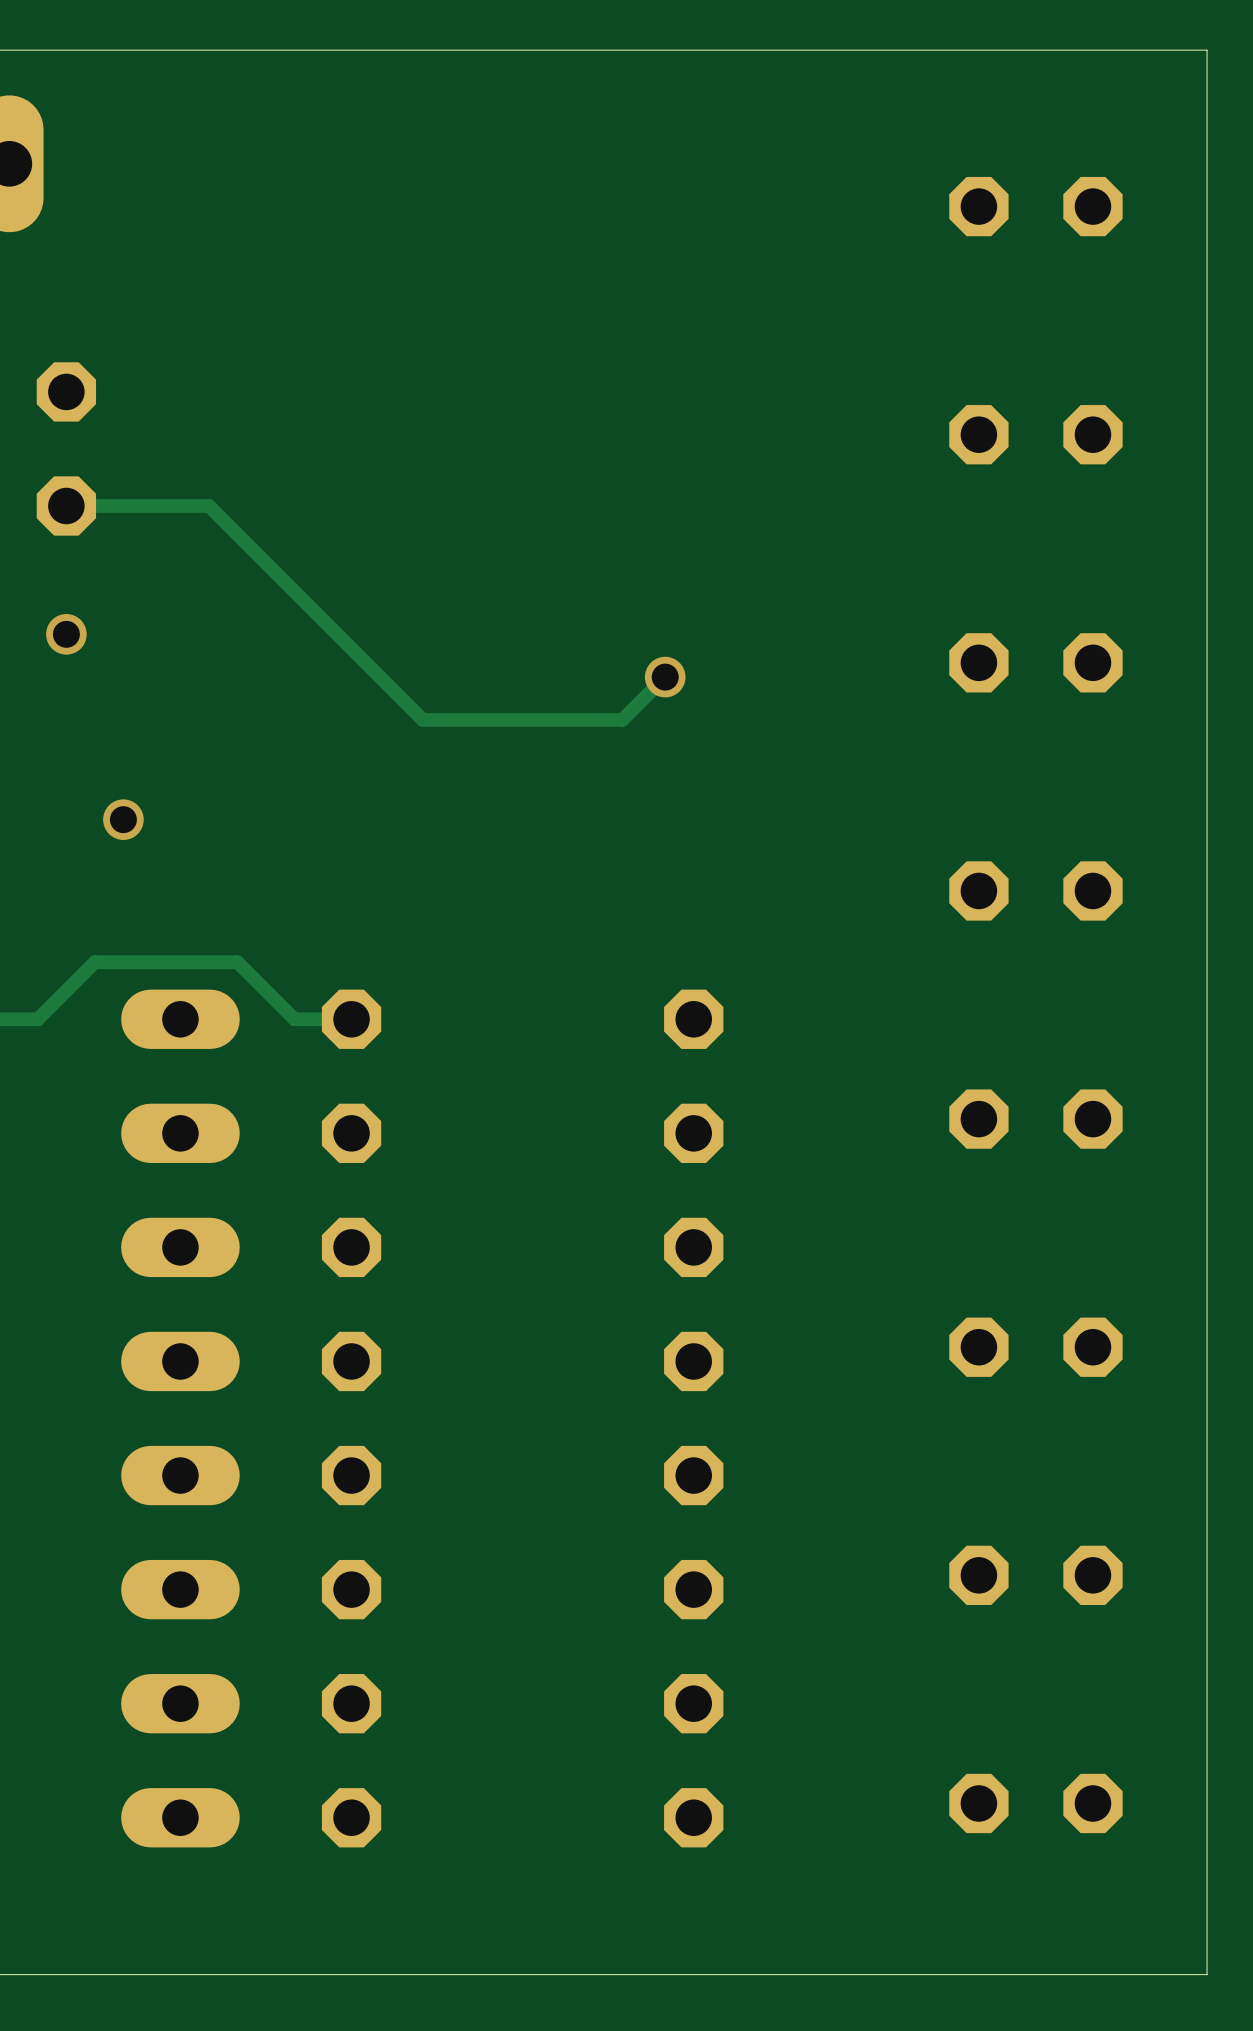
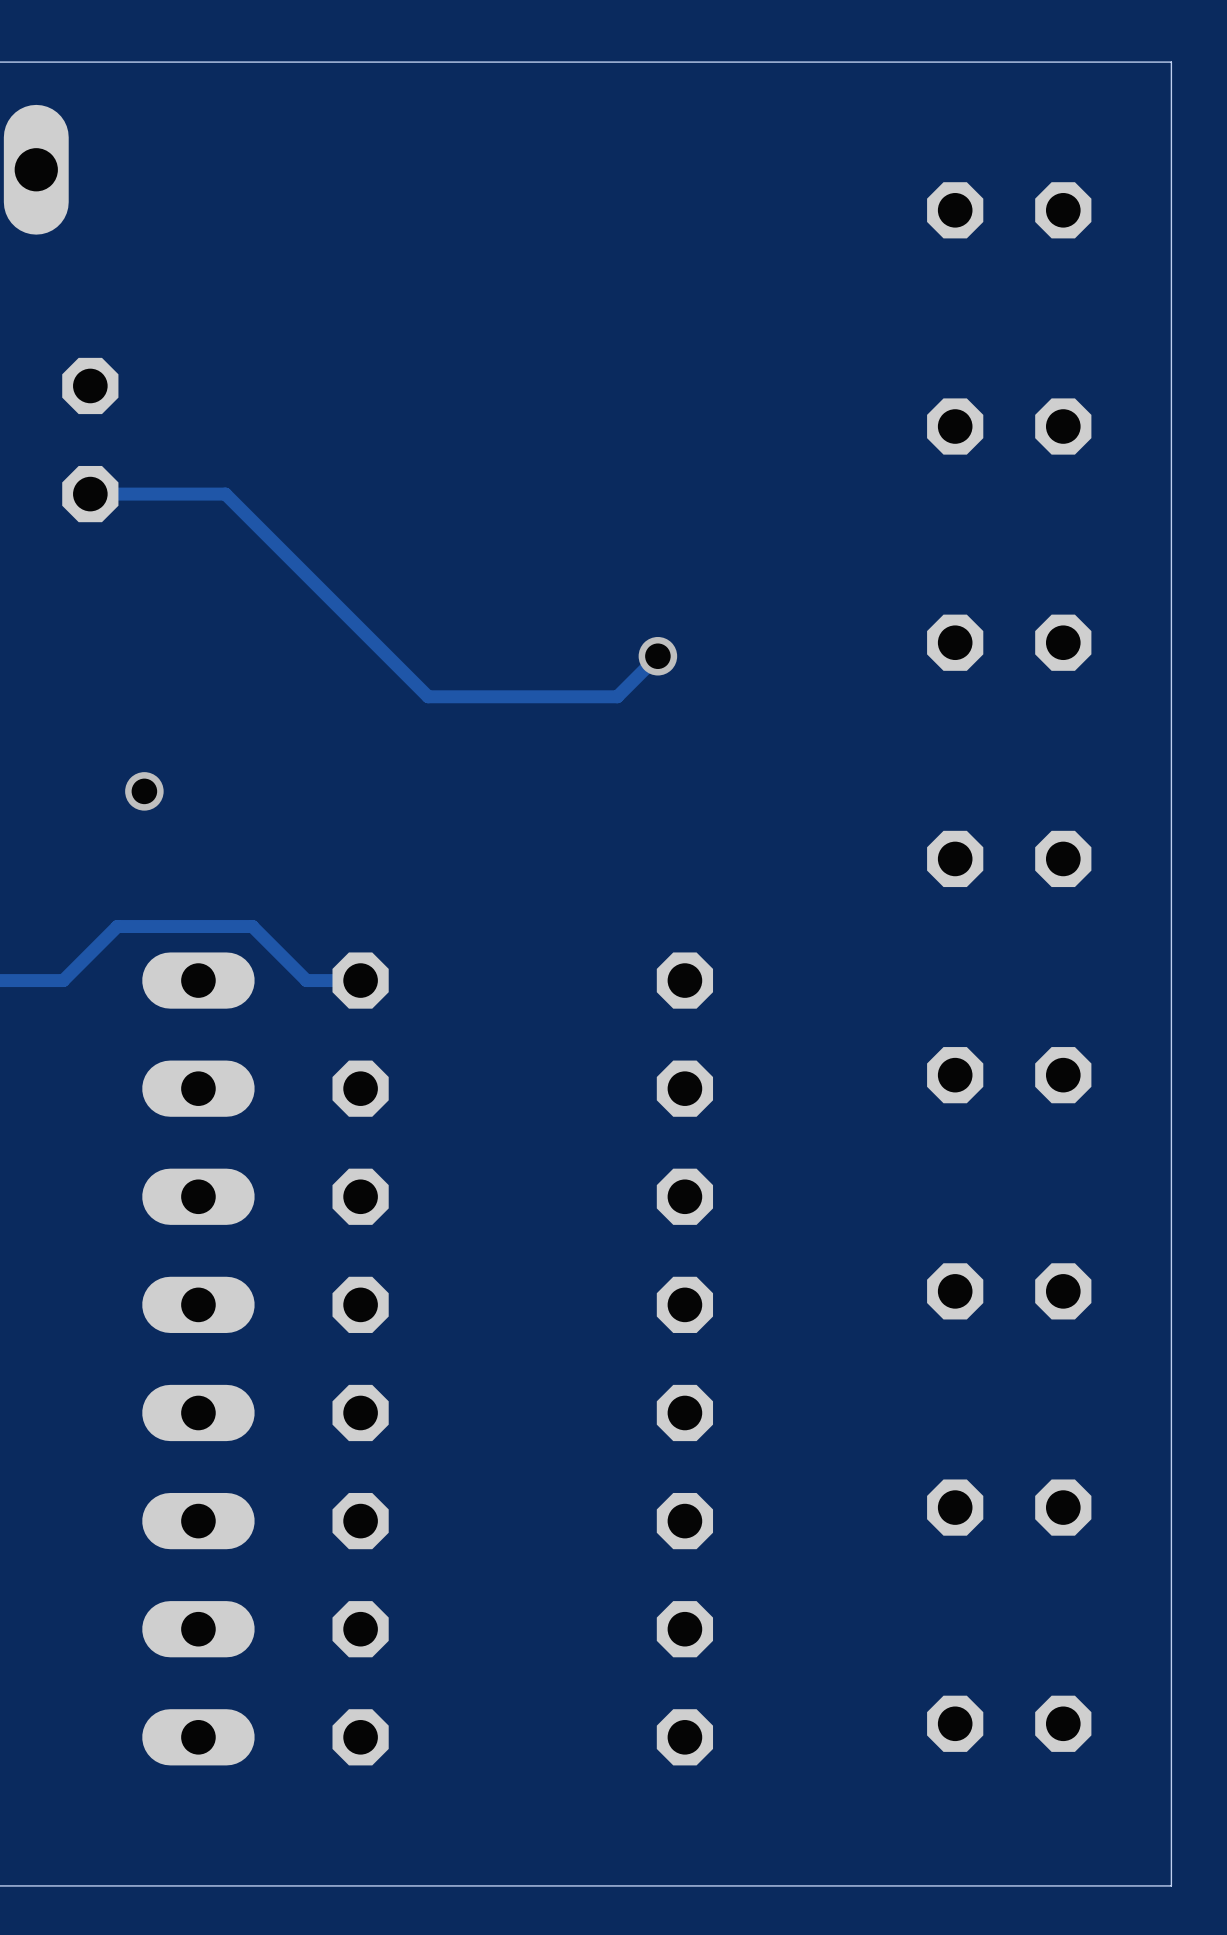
via: (66, 634) -> none

